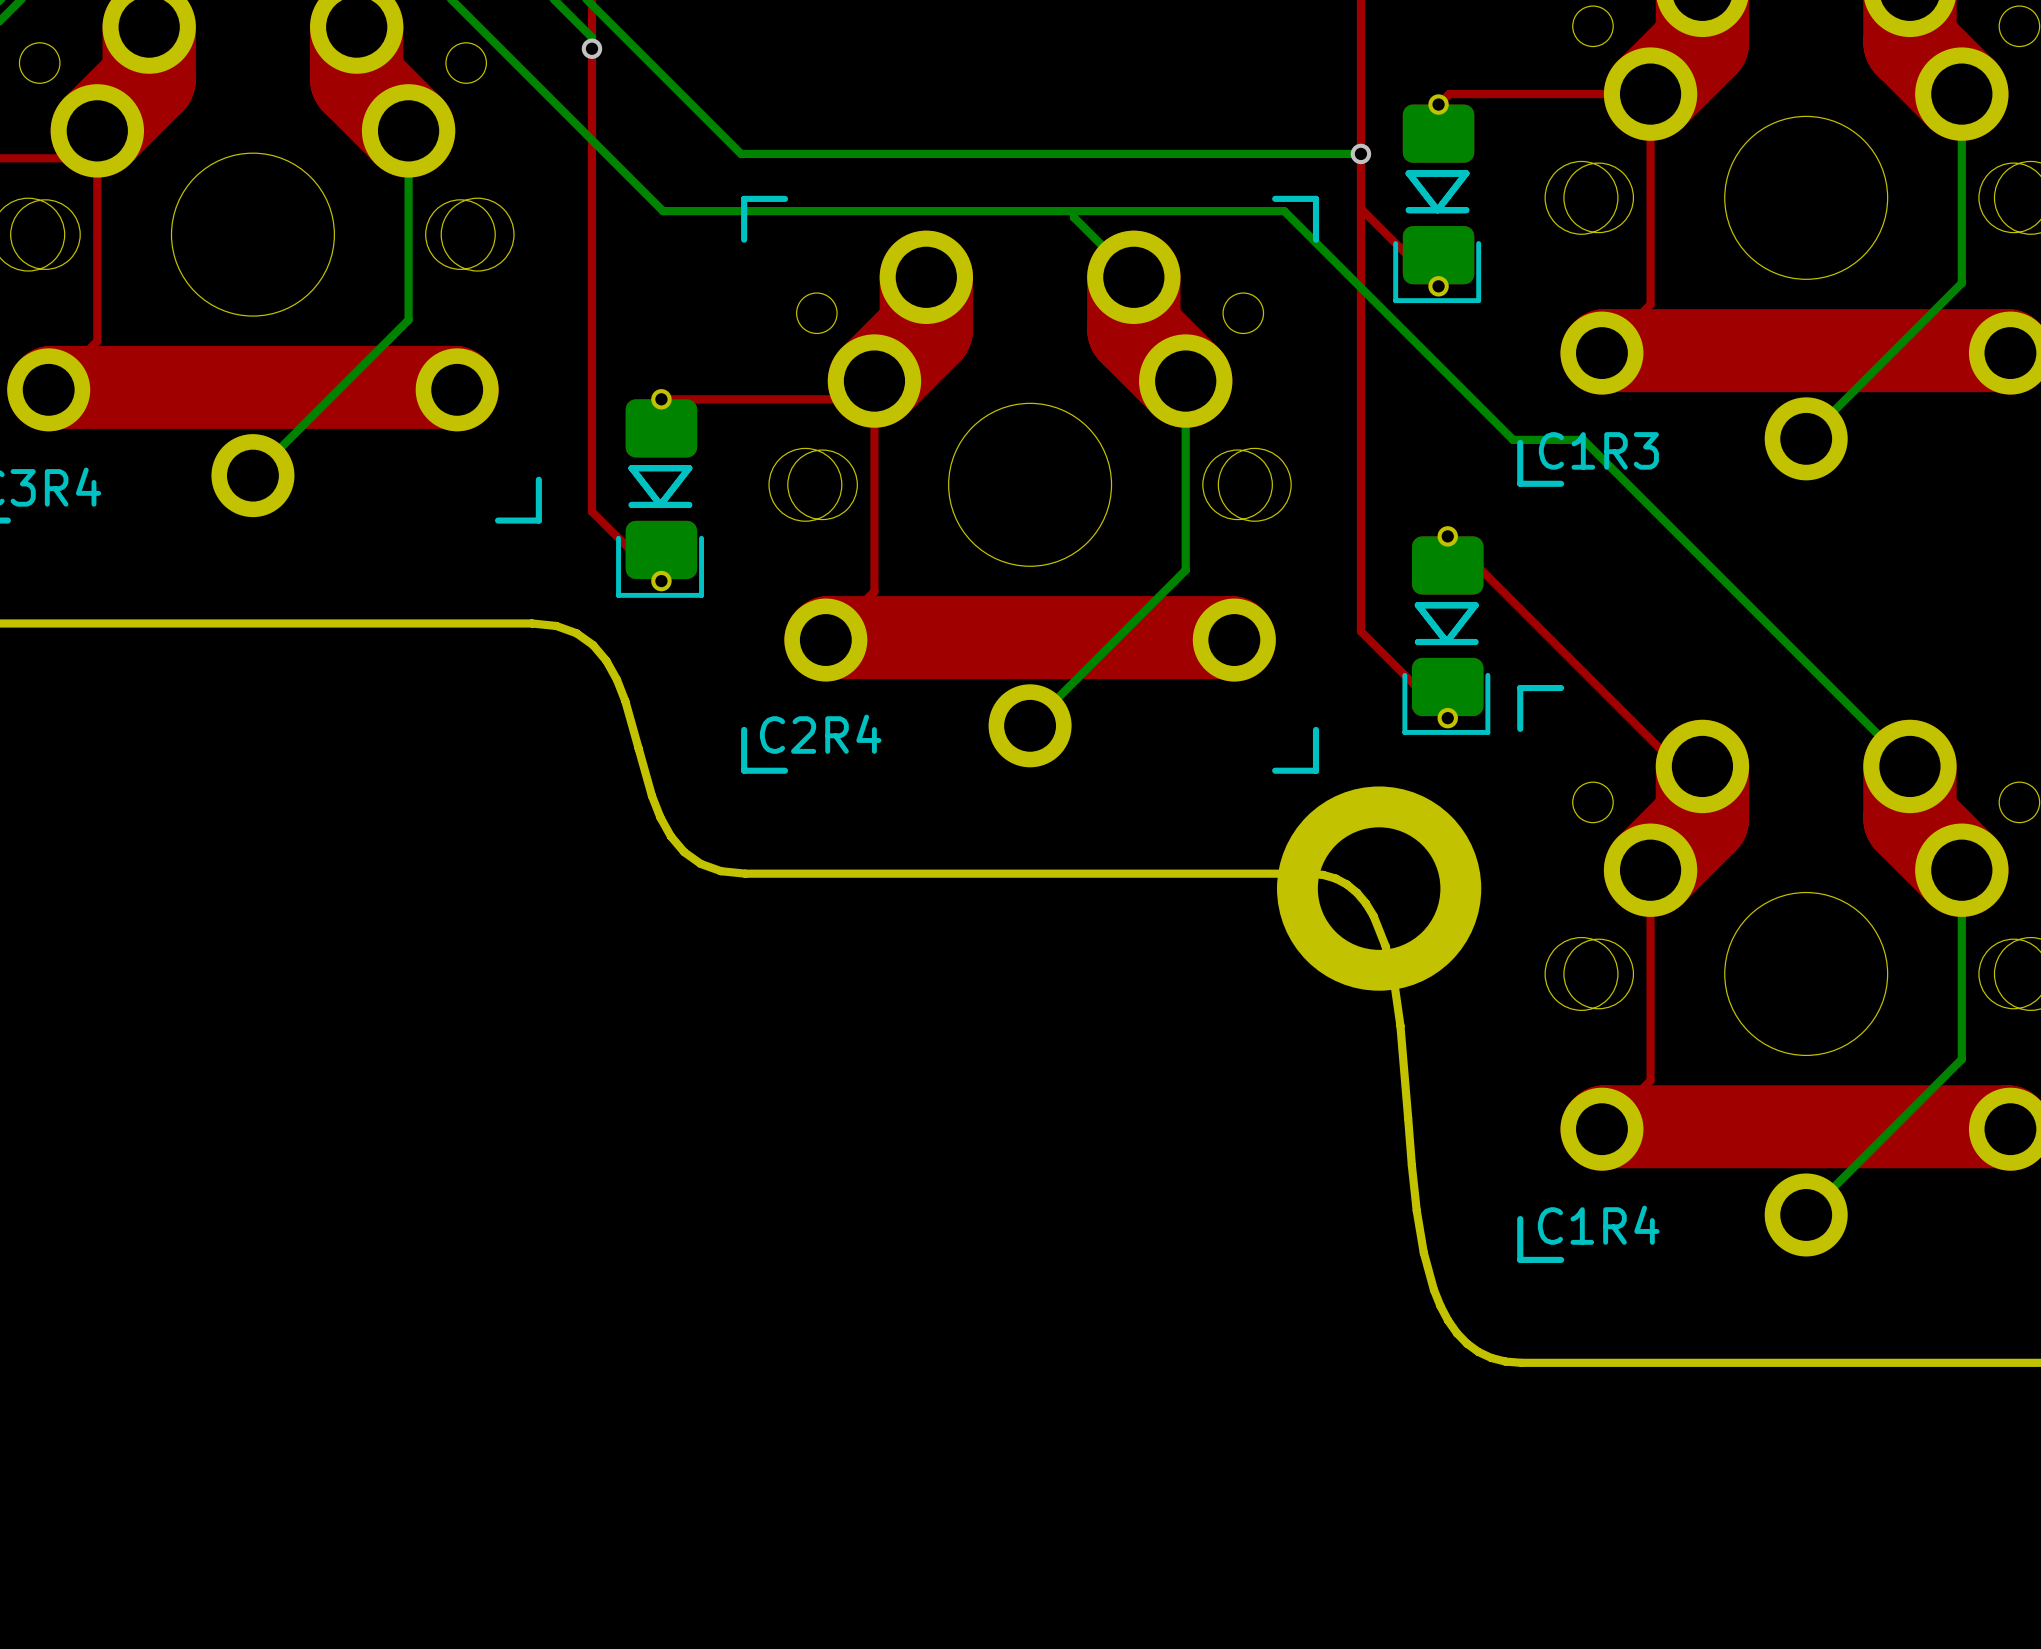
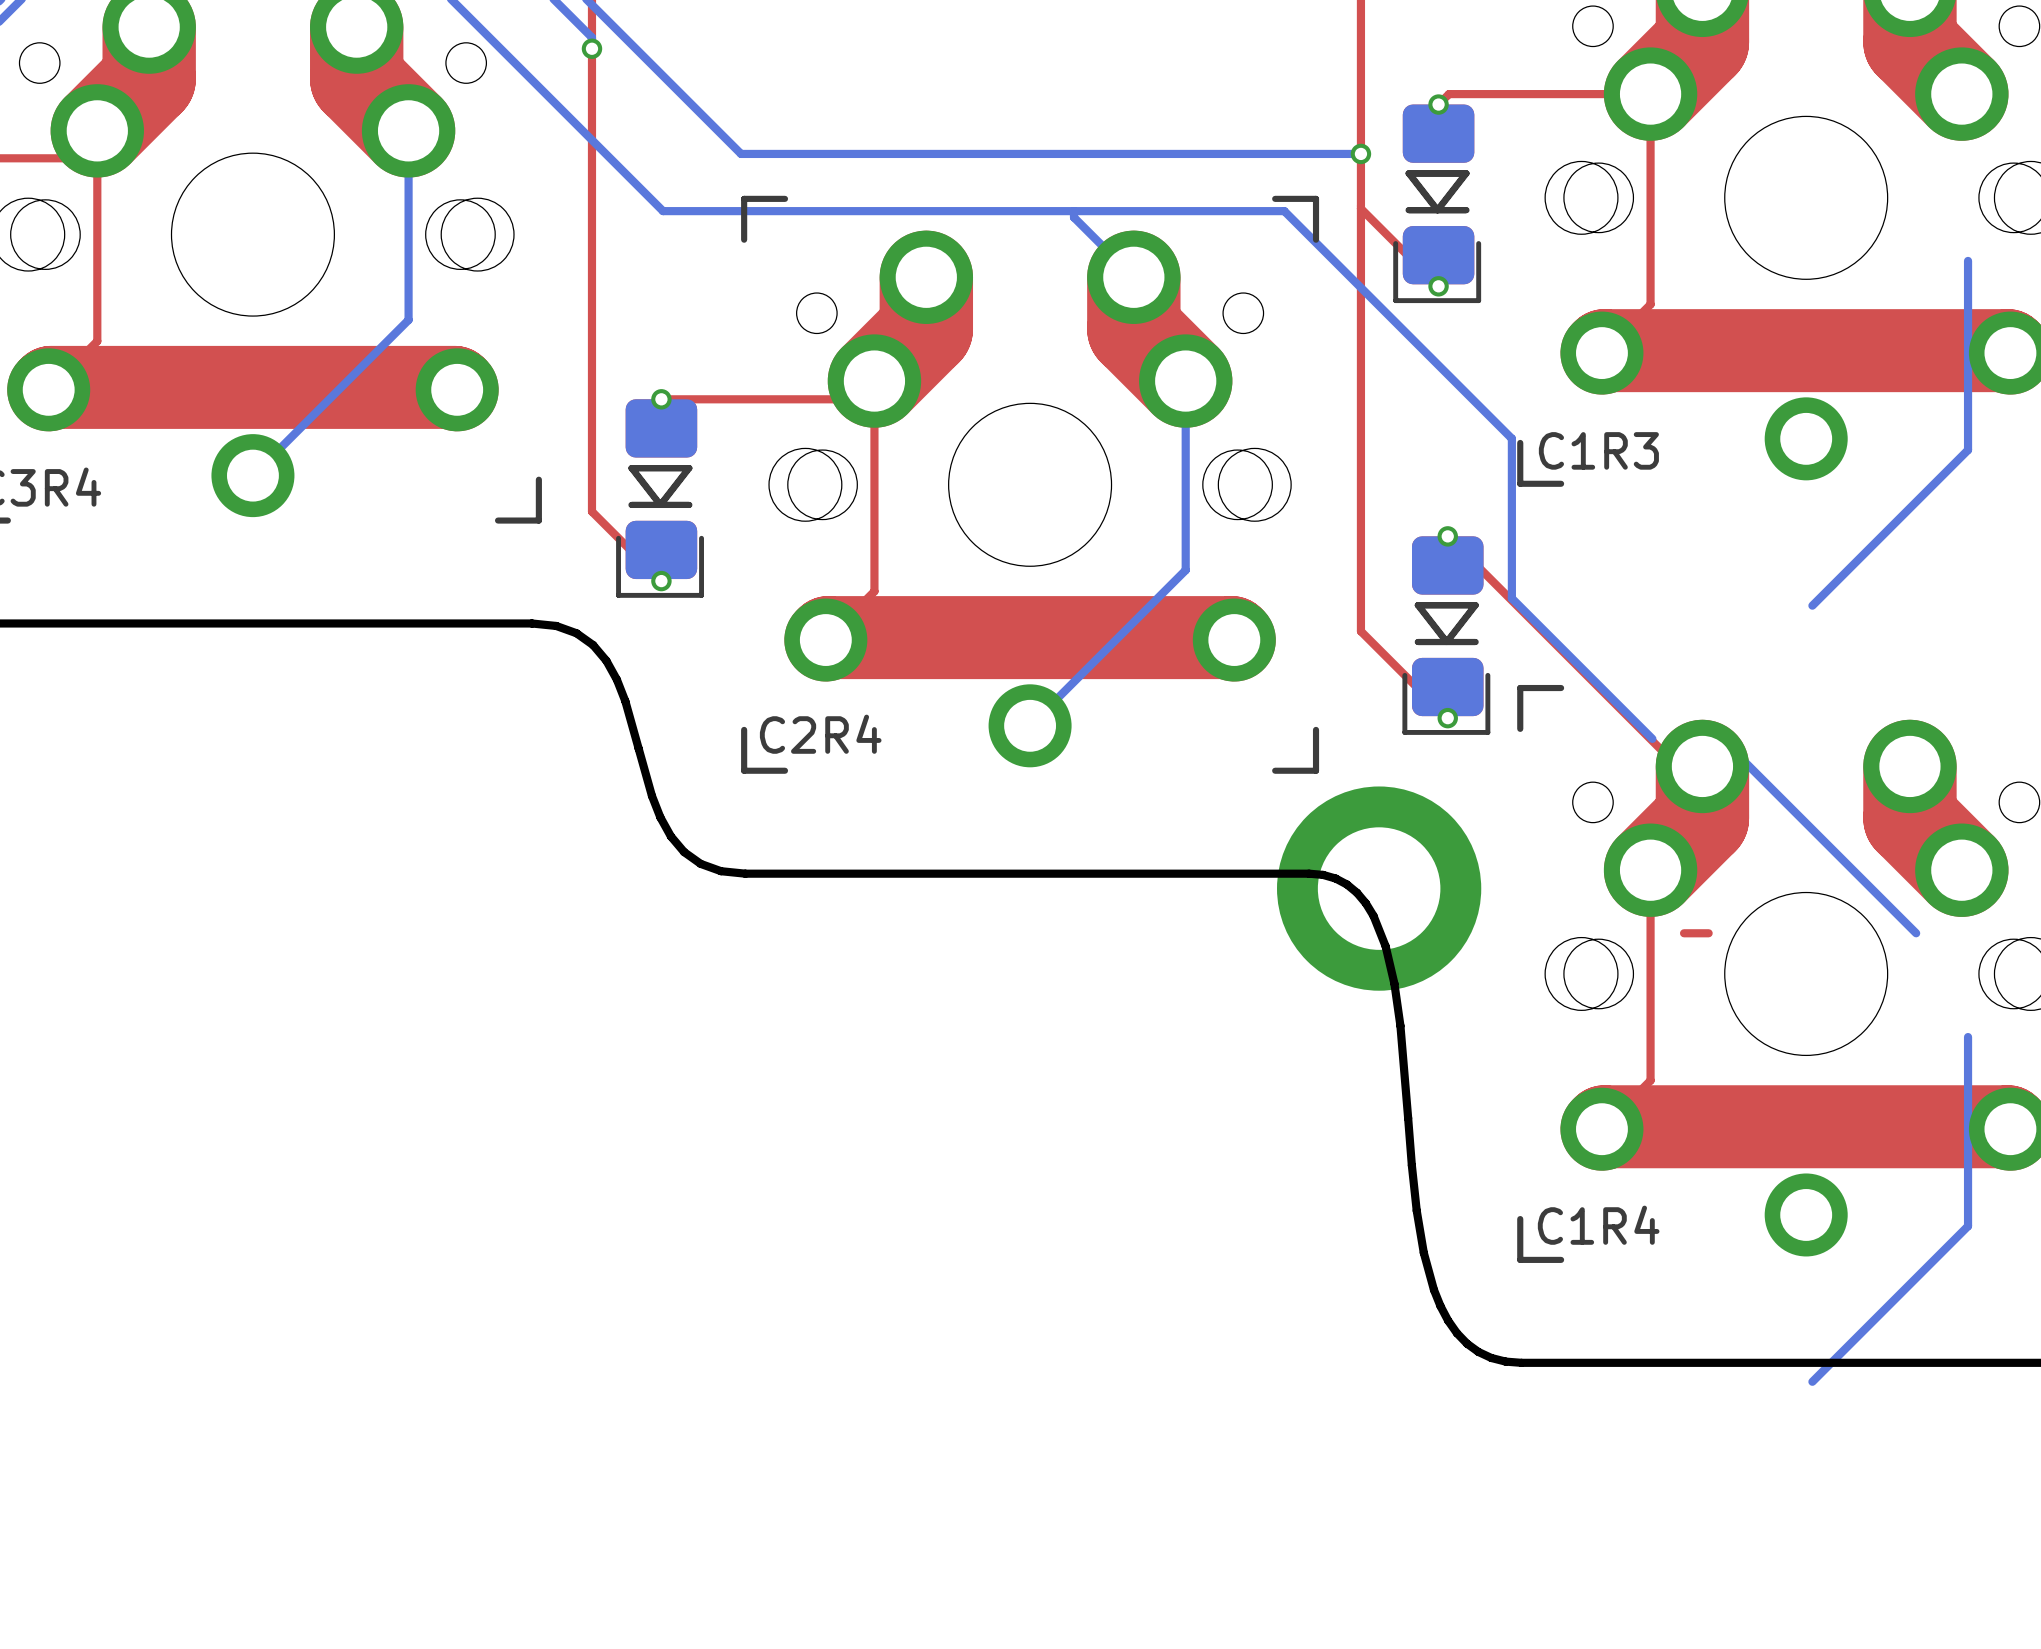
bottom track: (1961, 94) (1961, 283) (1806, 438) -> (1968, 260) (1968, 450) (1812, 605)
bottom track: (1511, 438) (1583, 439) (1909, 766) -> (1511, 438) (1511, 598) (1652, 738)
bottom track: none -> (1720, 737) (1916, 933)
bottom track: (1961, 870) (1961, 1059) (1806, 1214) -> (1968, 1037) (1968, 1226) (1812, 1381)
top track: none -> (1708, 933) (1684, 933)

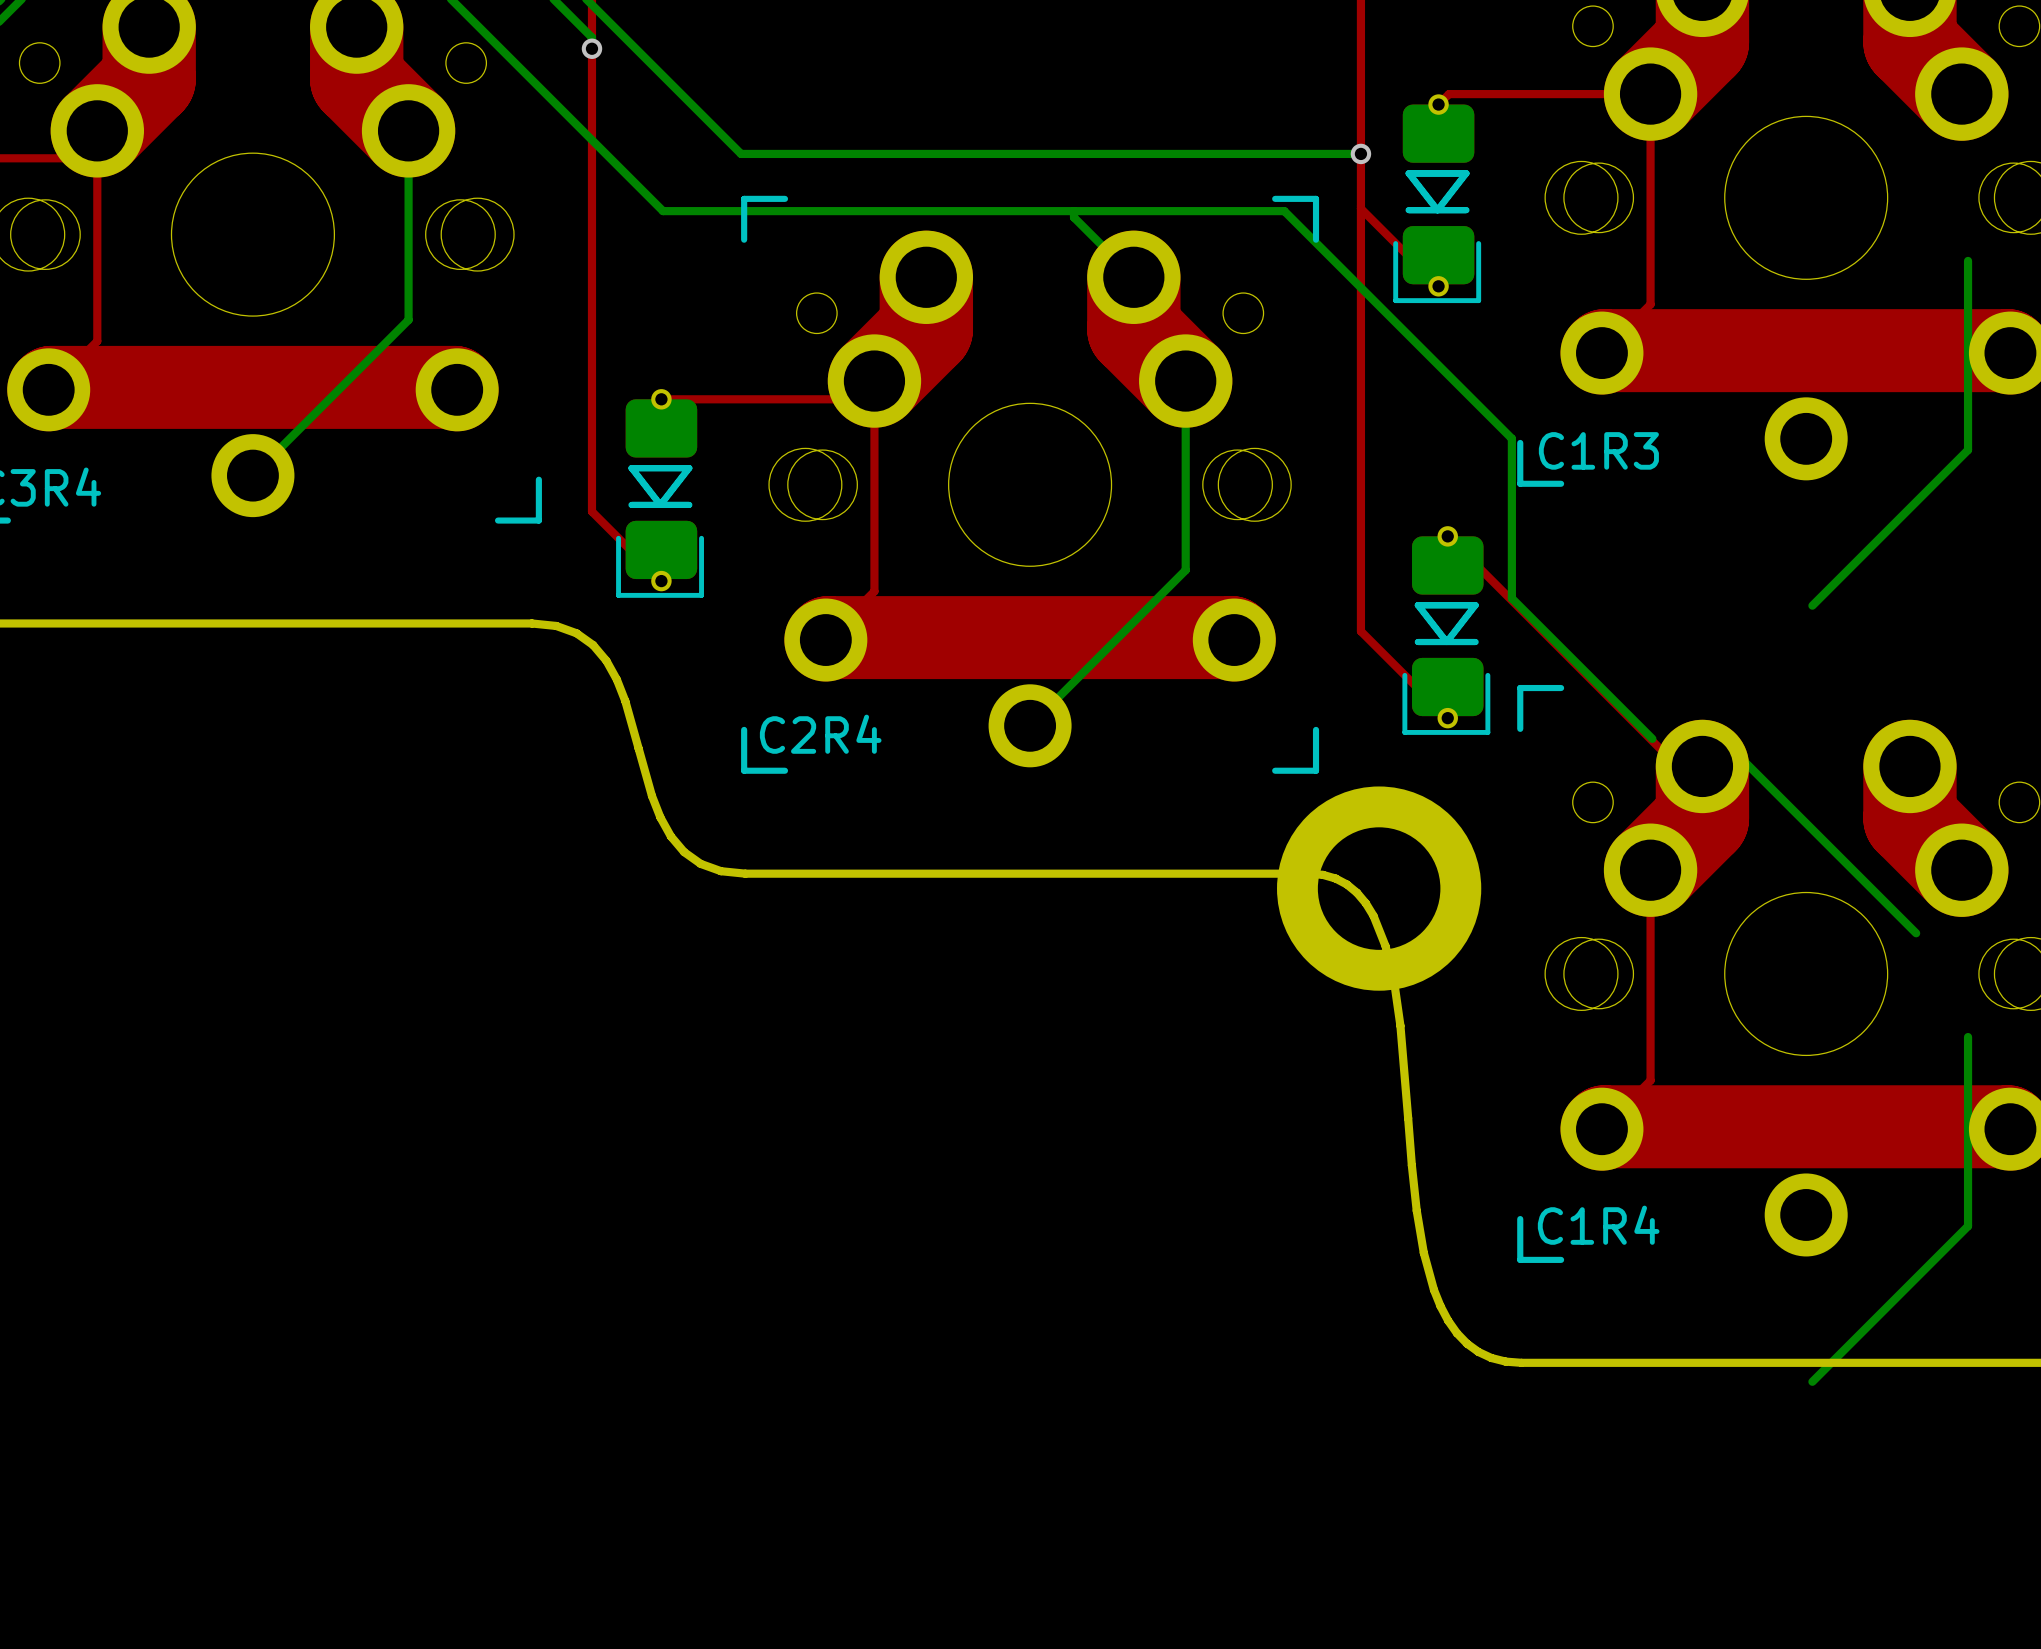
top track: (1708, 933) (1684, 933) -> none

